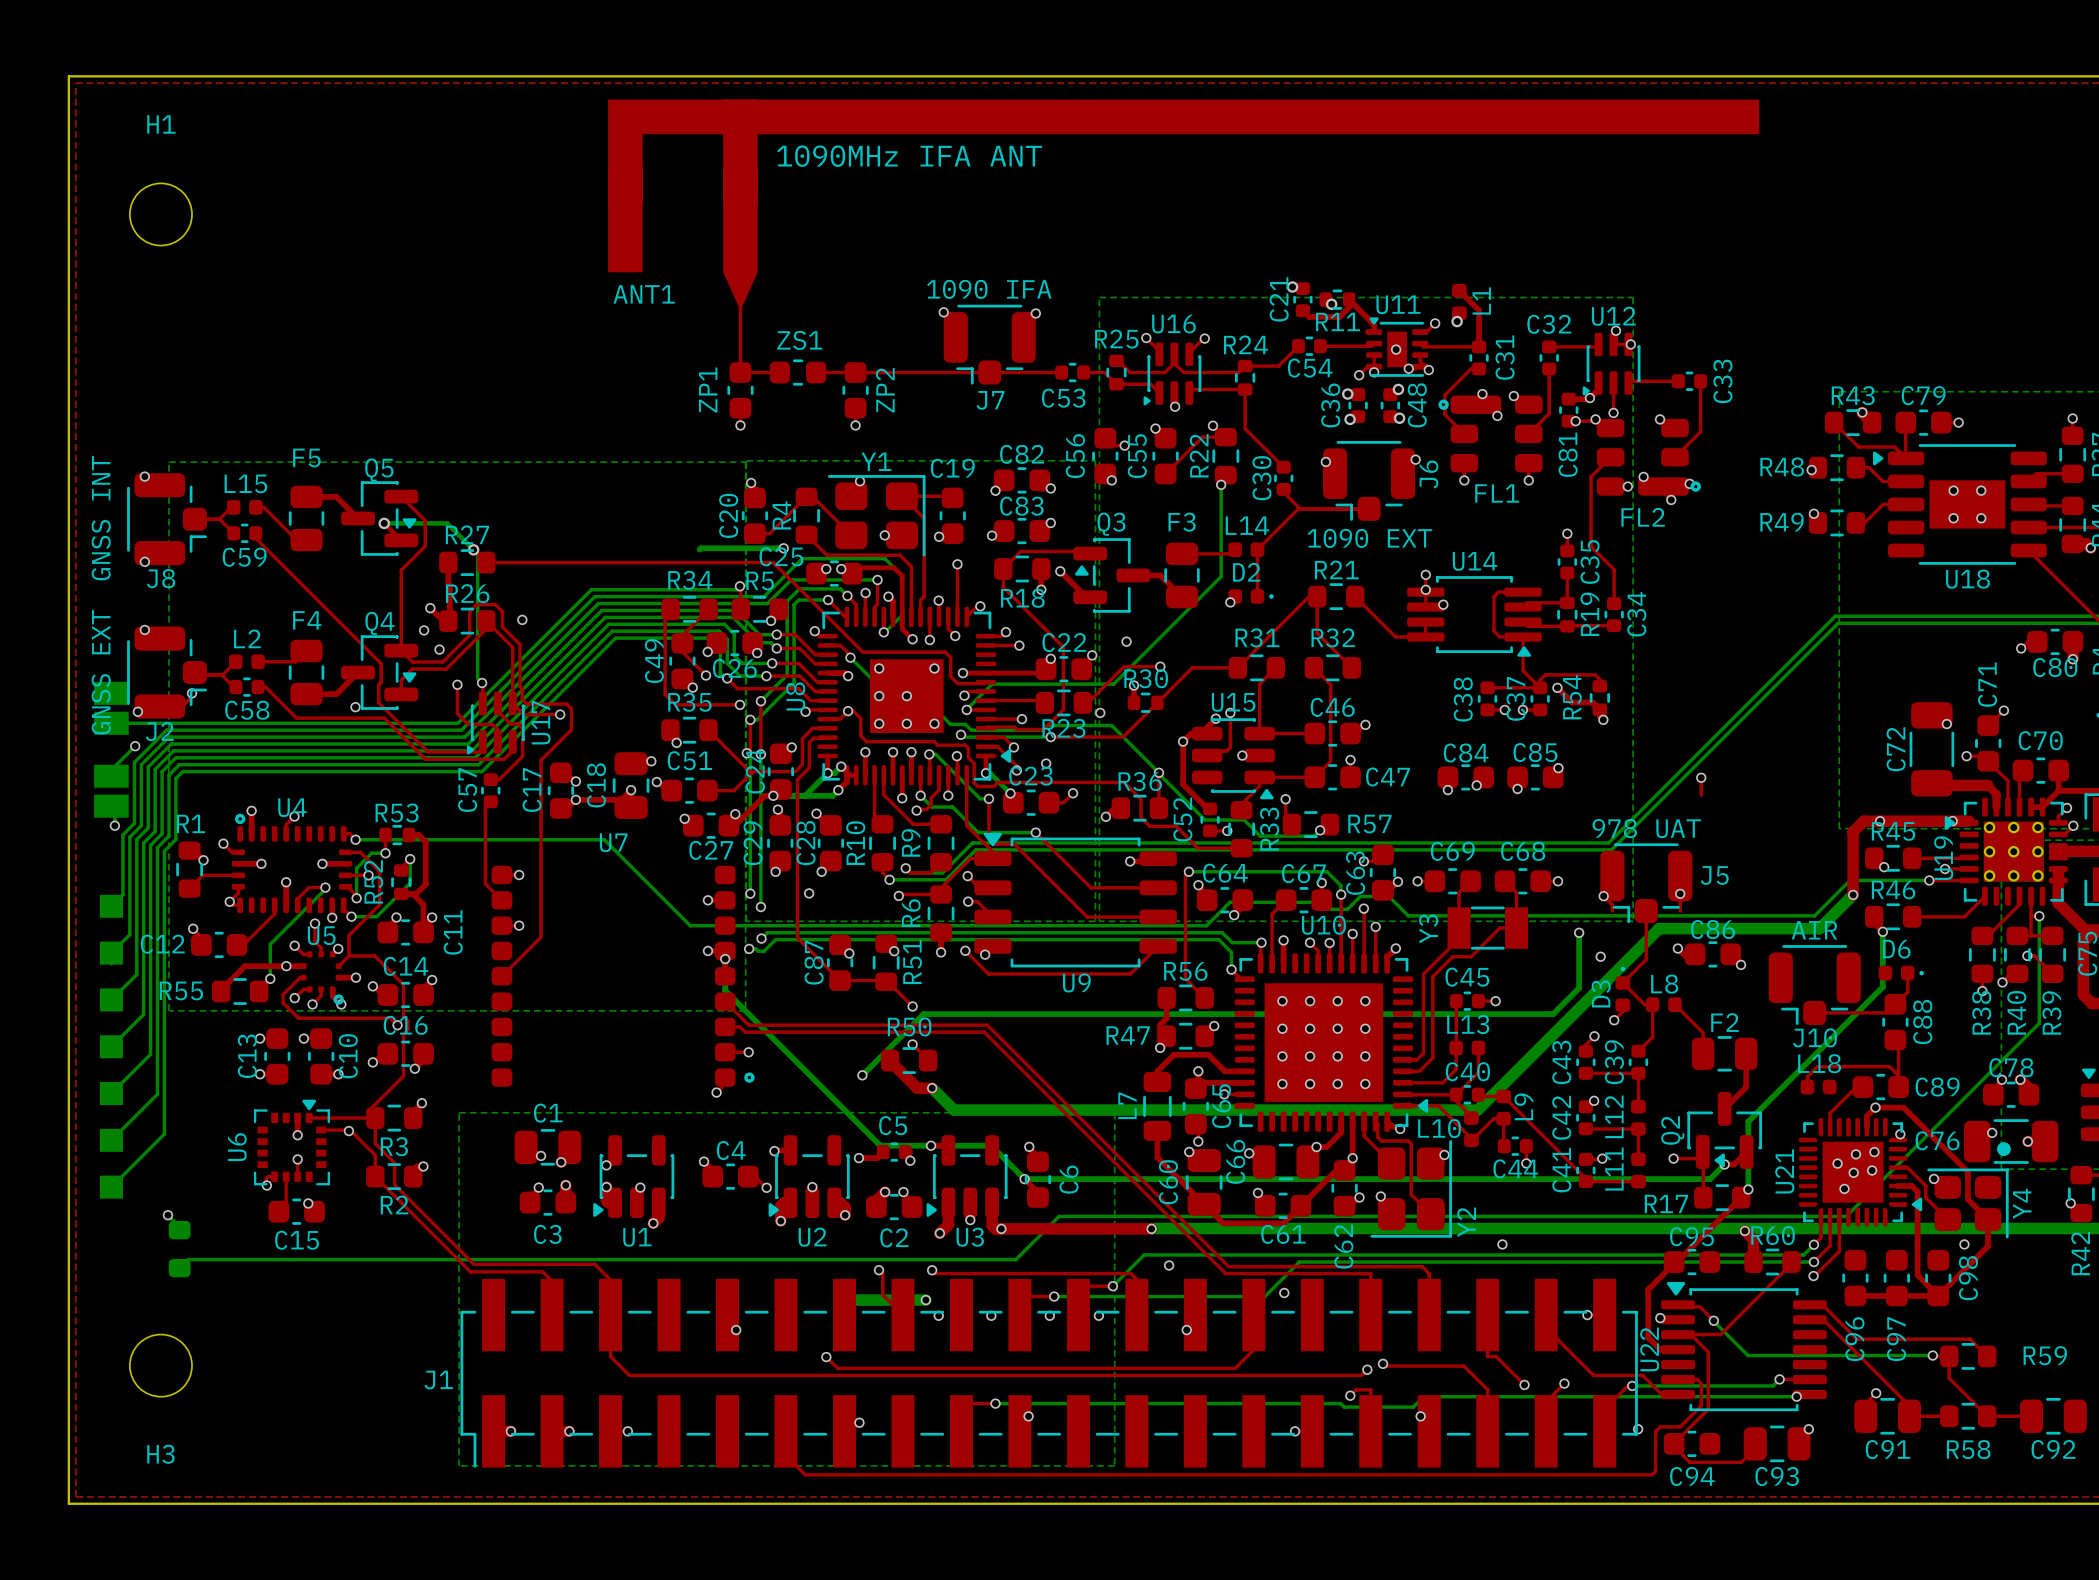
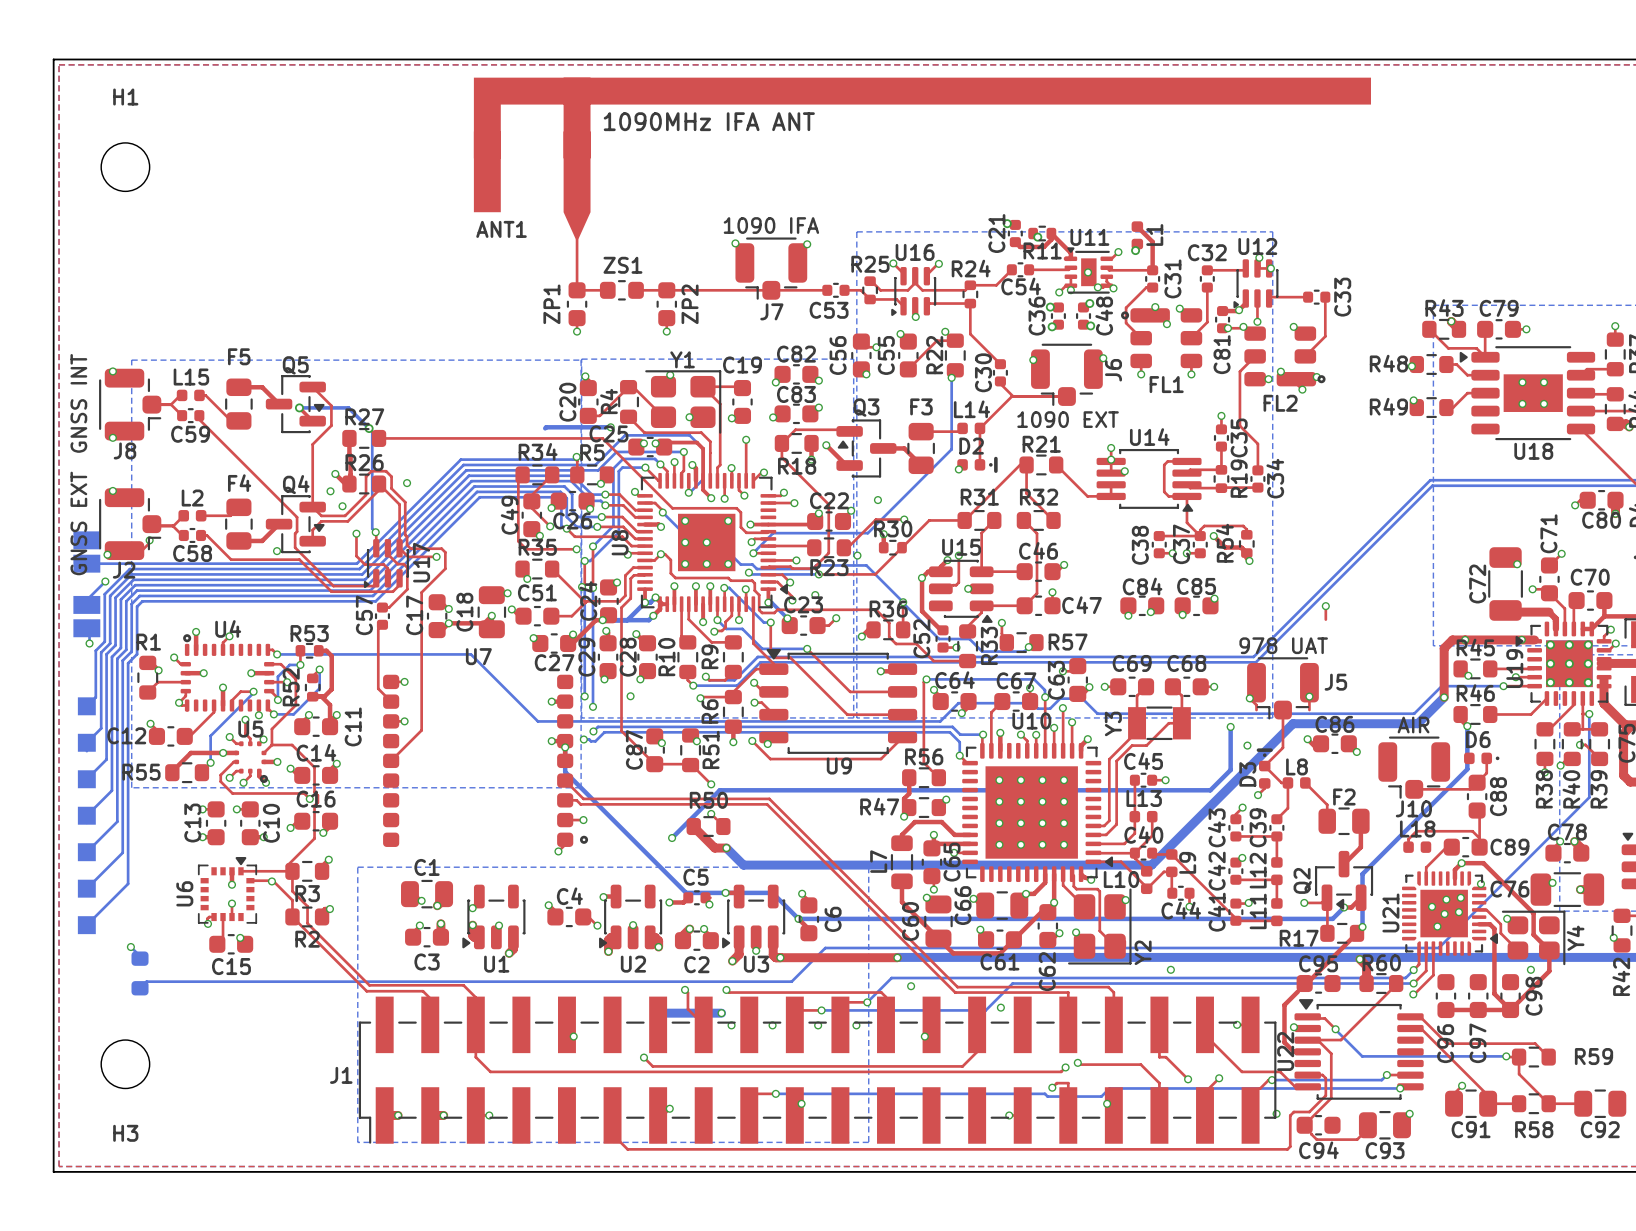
line: none -> (995, 458) (995, 471)
line: none -> (1258, 750) (1271, 750)
drawing: [1997, 1142, 2011, 1157] -> none

